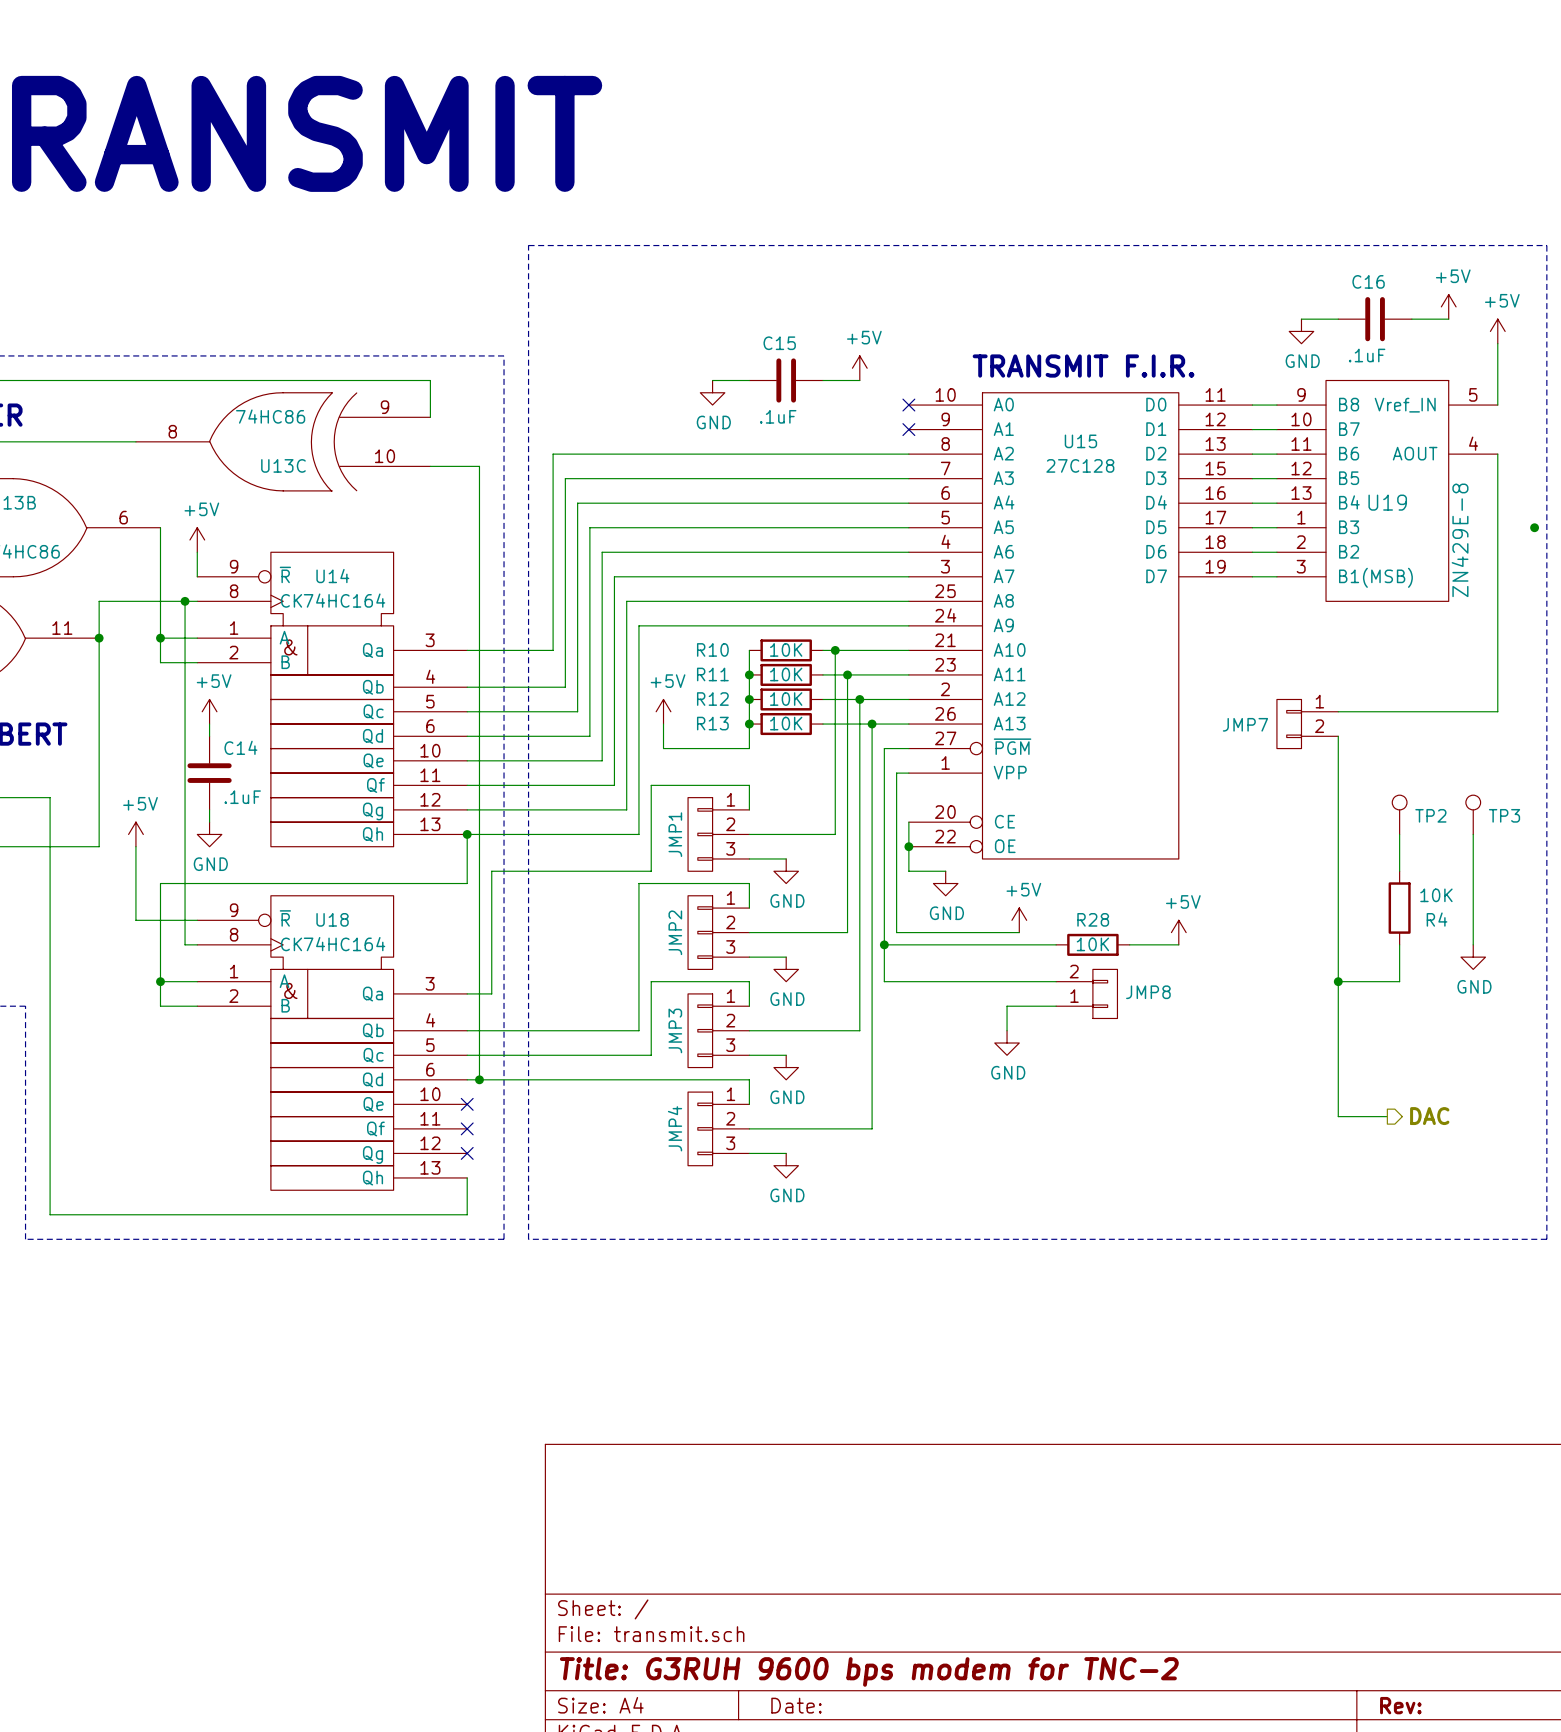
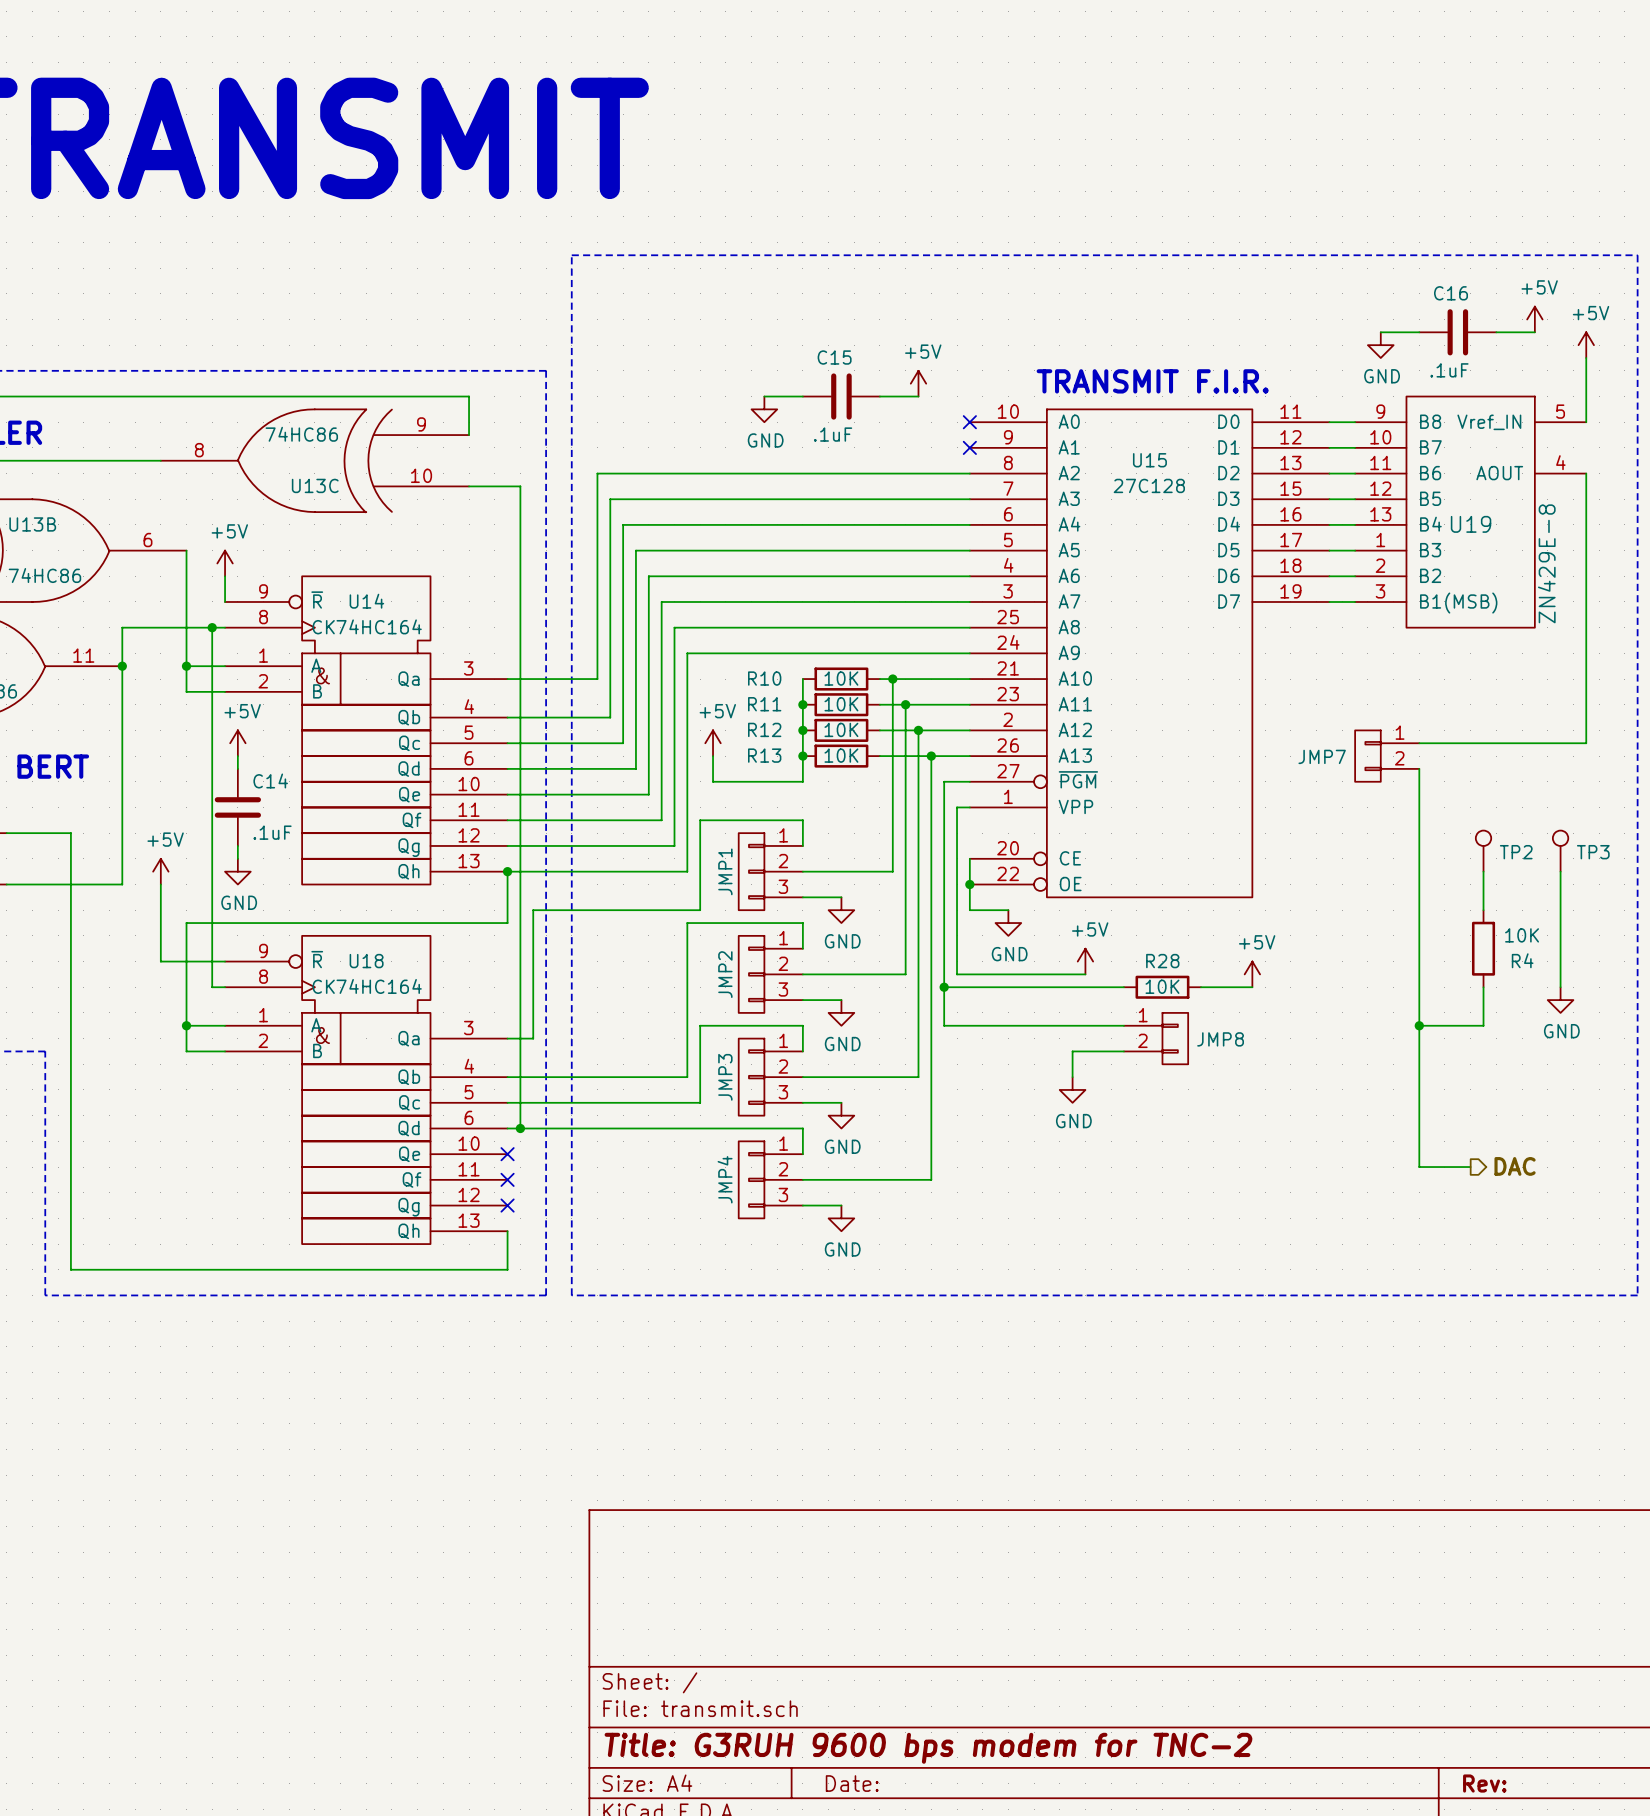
junction: (1534, 527) -> none
JMP8 flip: as is (1105, 993) -> up-down (1175, 1038)

